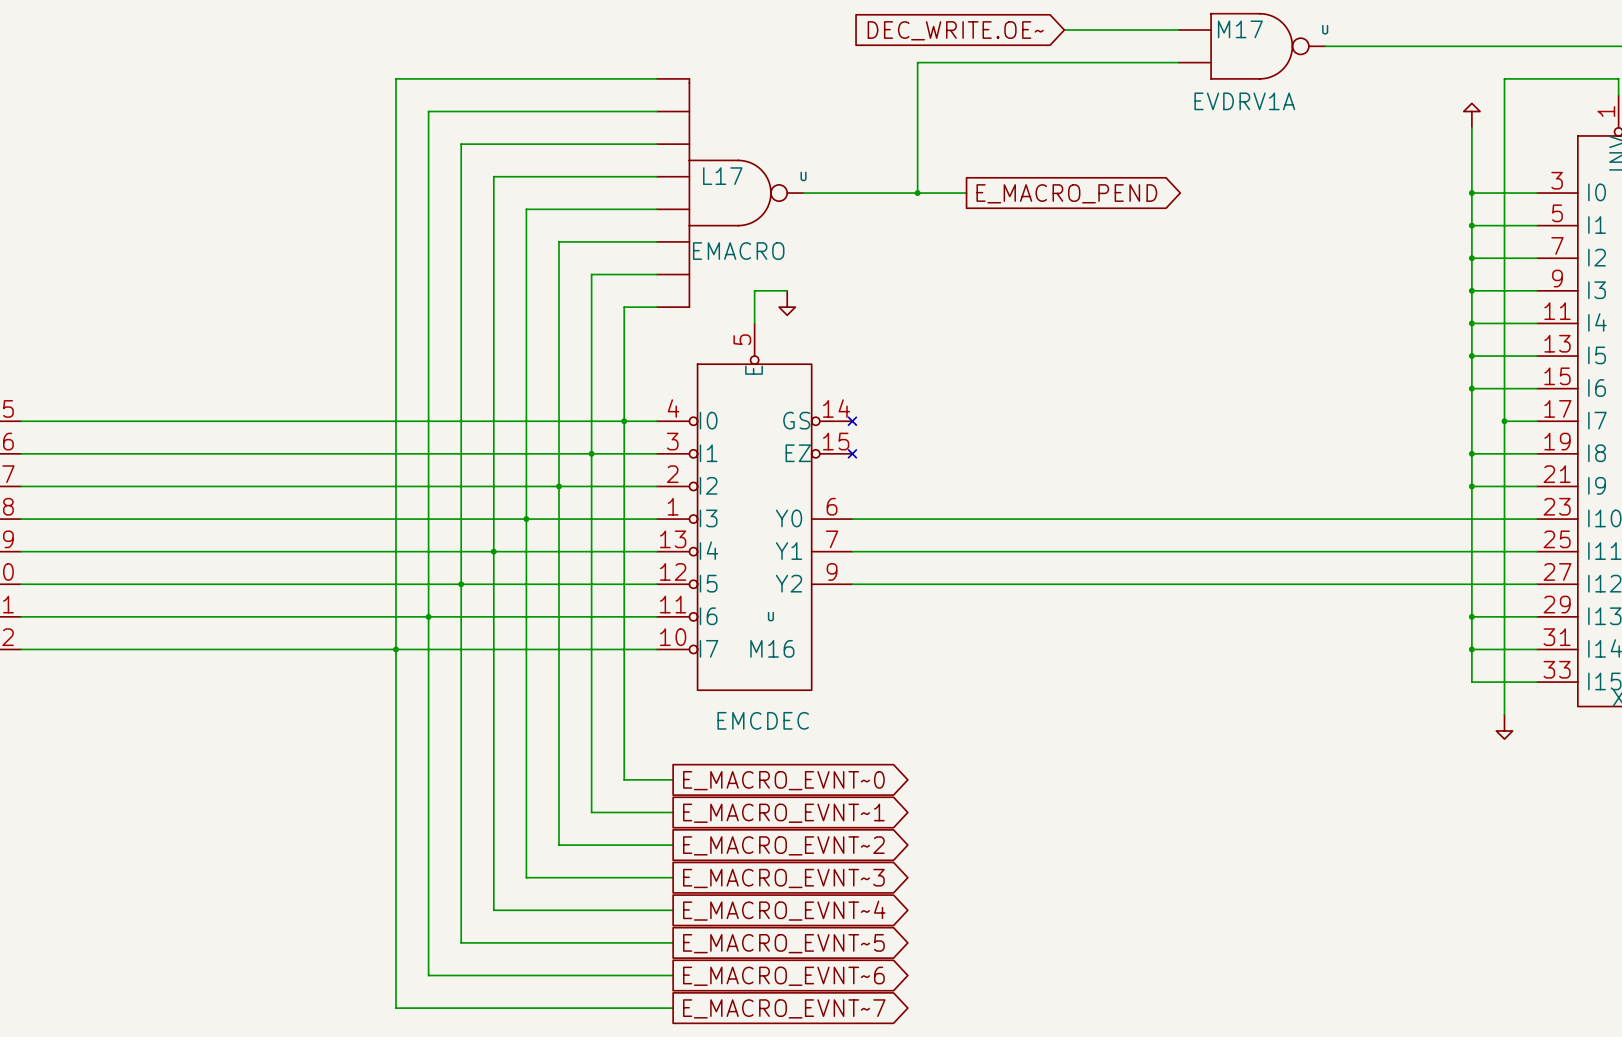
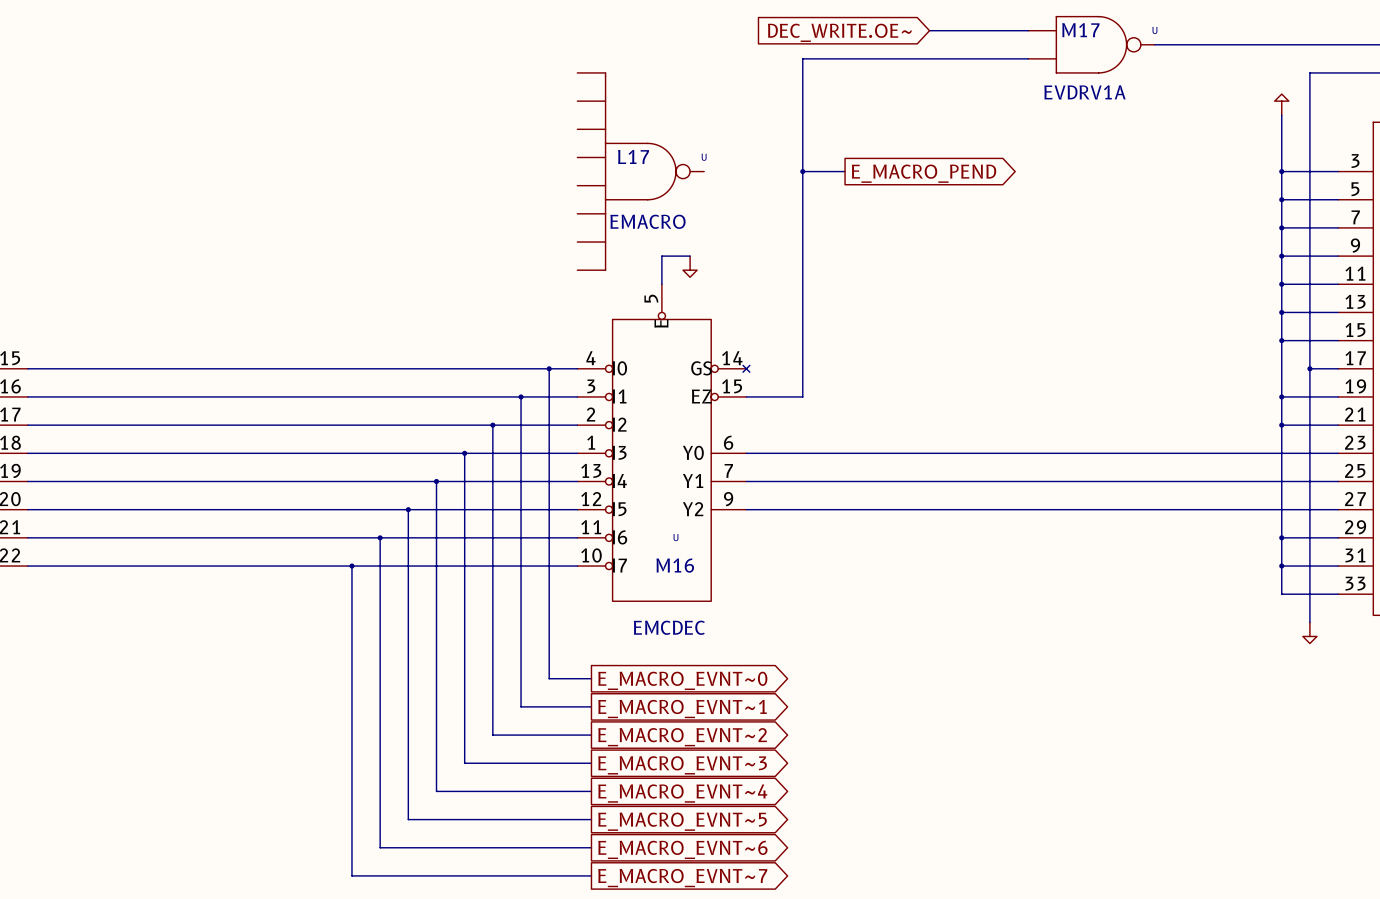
wire: (656, 78) (395, 78) (395, 649) -> none
wire: (656, 111) (428, 111) (428, 616) -> none
wire: (656, 144) (461, 144) (461, 584) -> none
wire: (656, 176) (493, 176) (493, 551) -> none
wire: (803, 193) (917, 193) -> (746, 396) (802, 396) (802, 171)
wire: (656, 209) (526, 209) (526, 519) -> none
wire: (656, 241) (559, 241) (559, 486) -> none
wire: (656, 274) (591, 274) (591, 453) -> none
wire: (656, 307) (624, 307) (624, 421) -> none
no-connect mark: (852, 453) -> none

